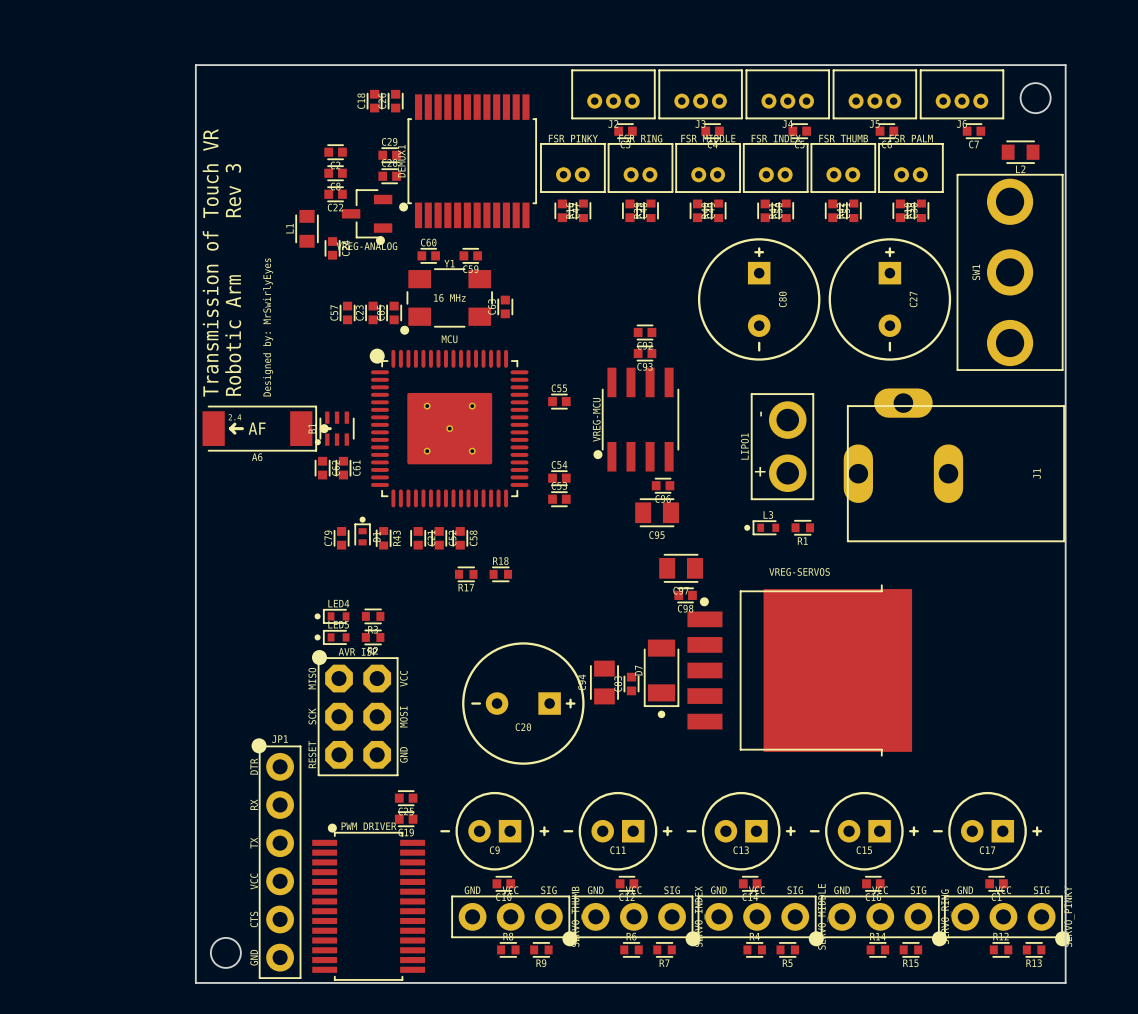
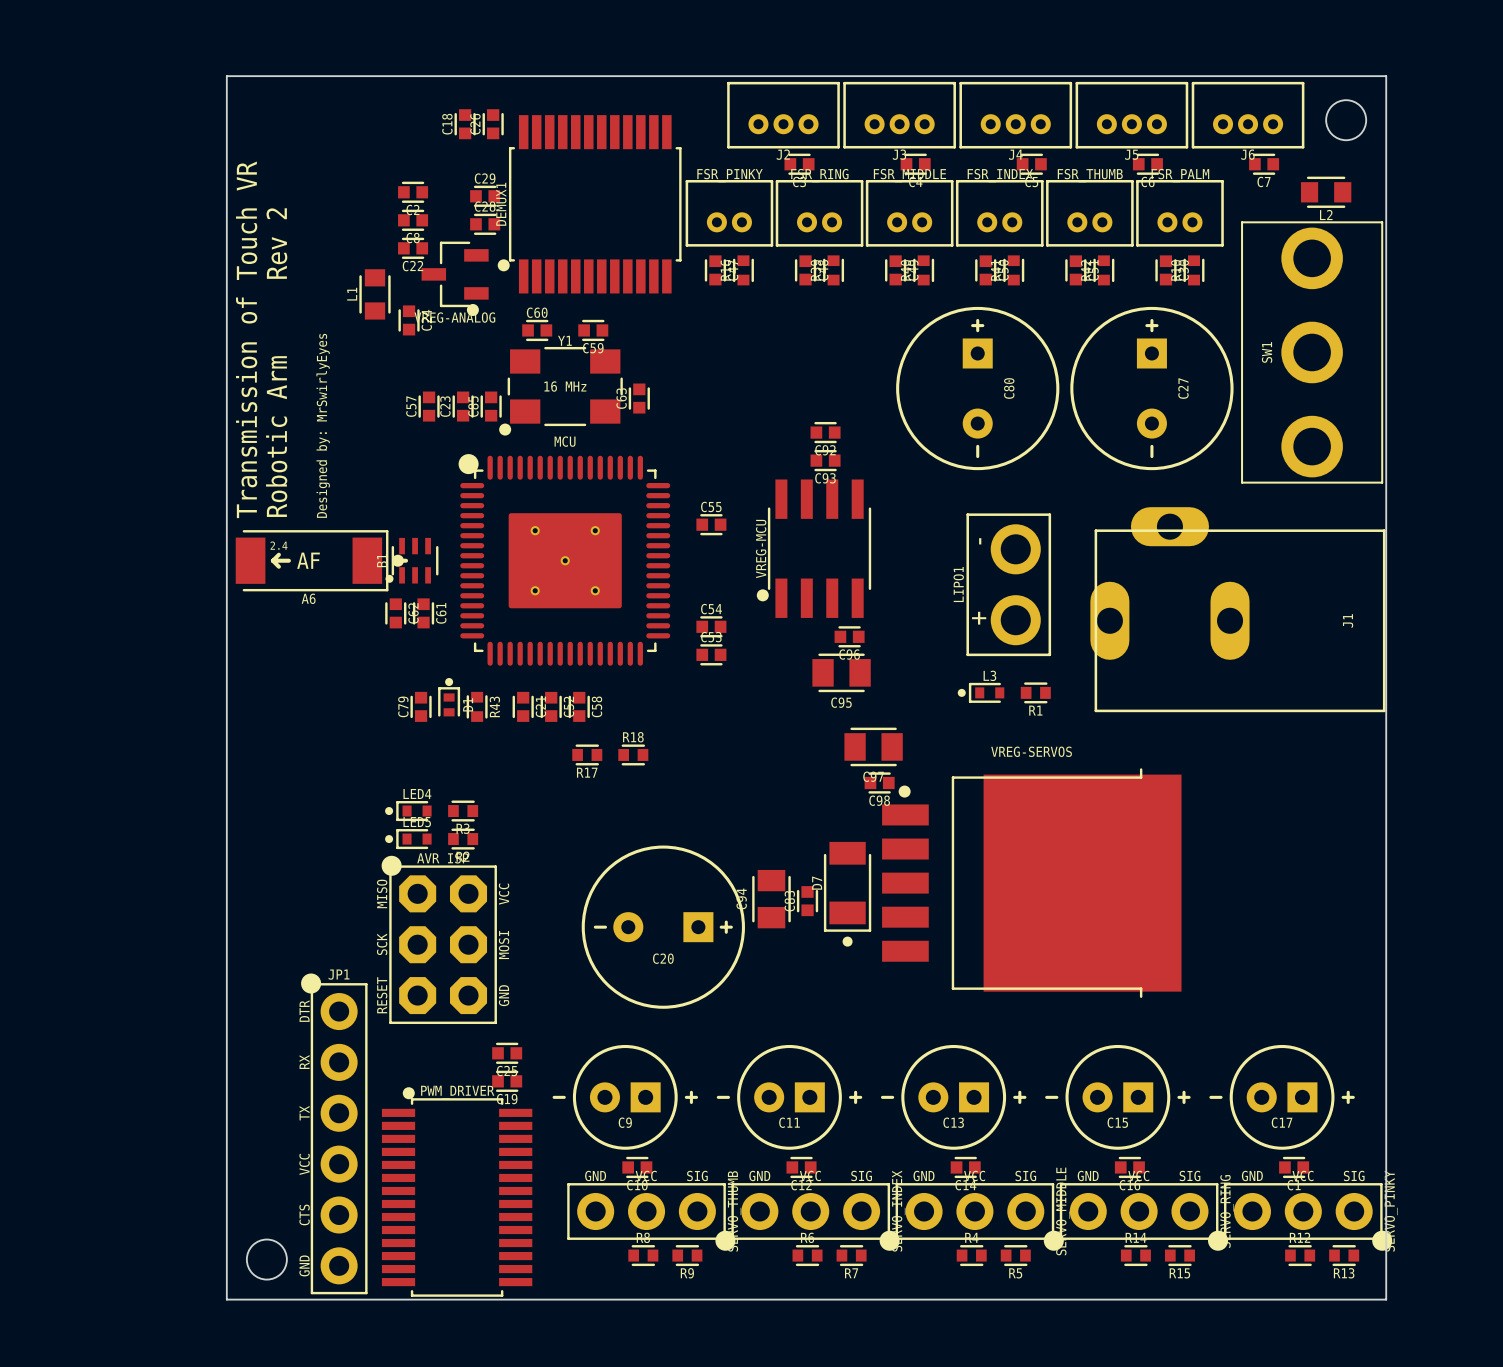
text: Robotic Arm Rev 3 (233, 279) -> Robotic Arm Rev 2 (276, 362)

